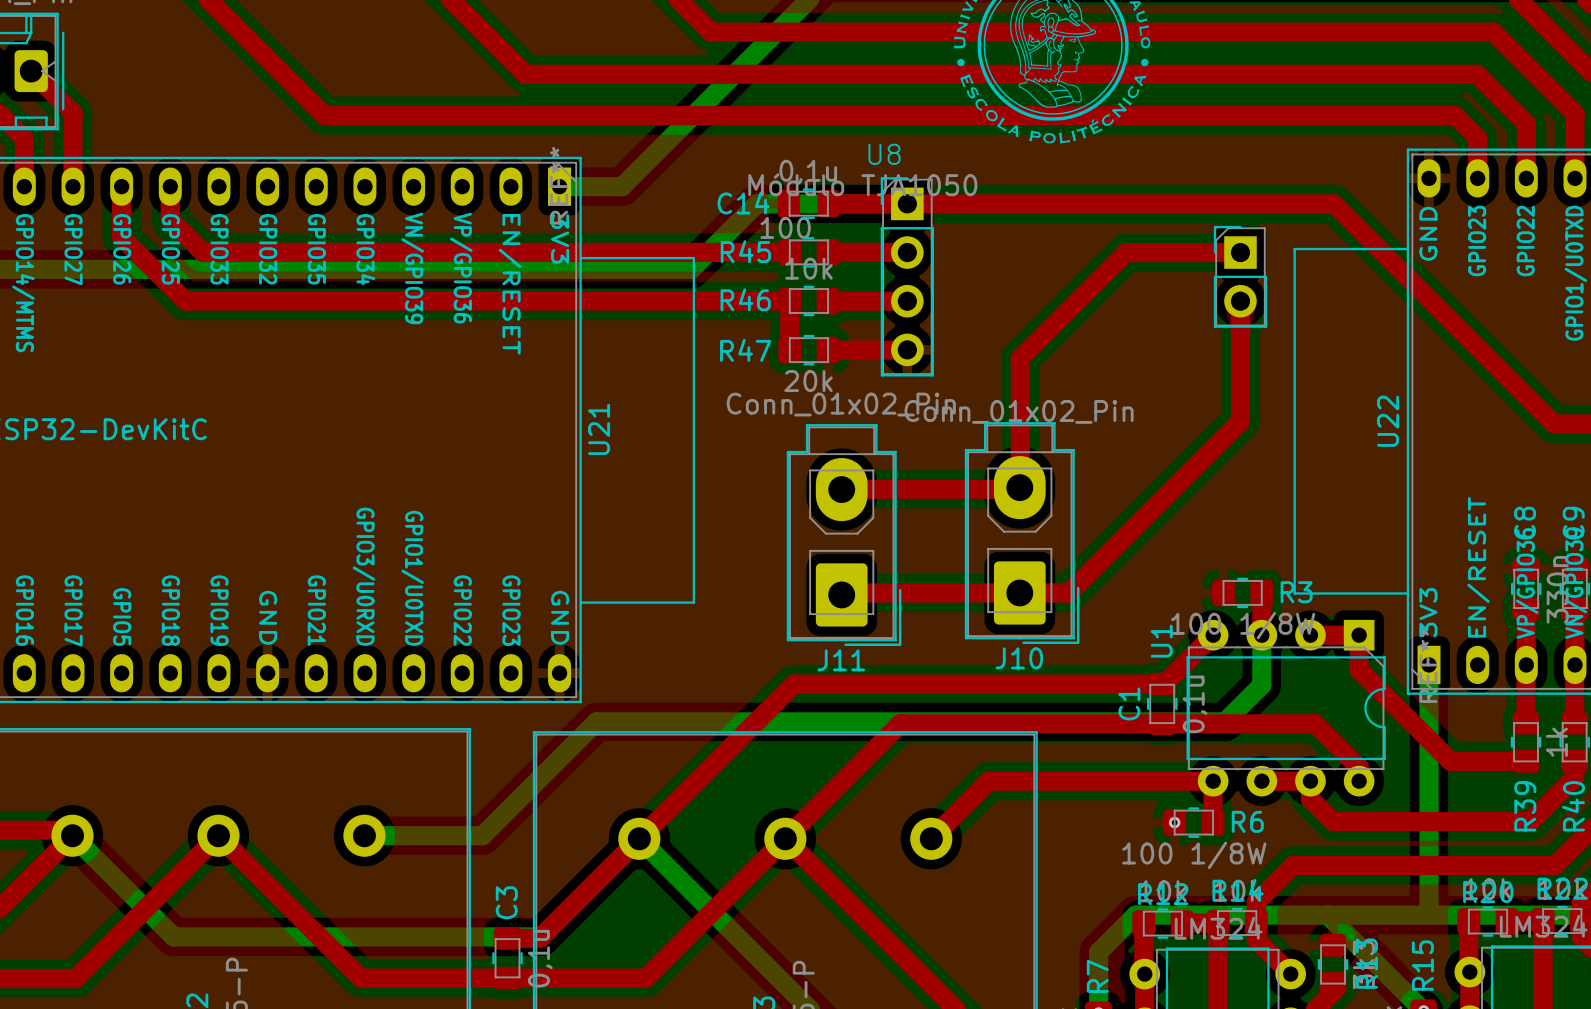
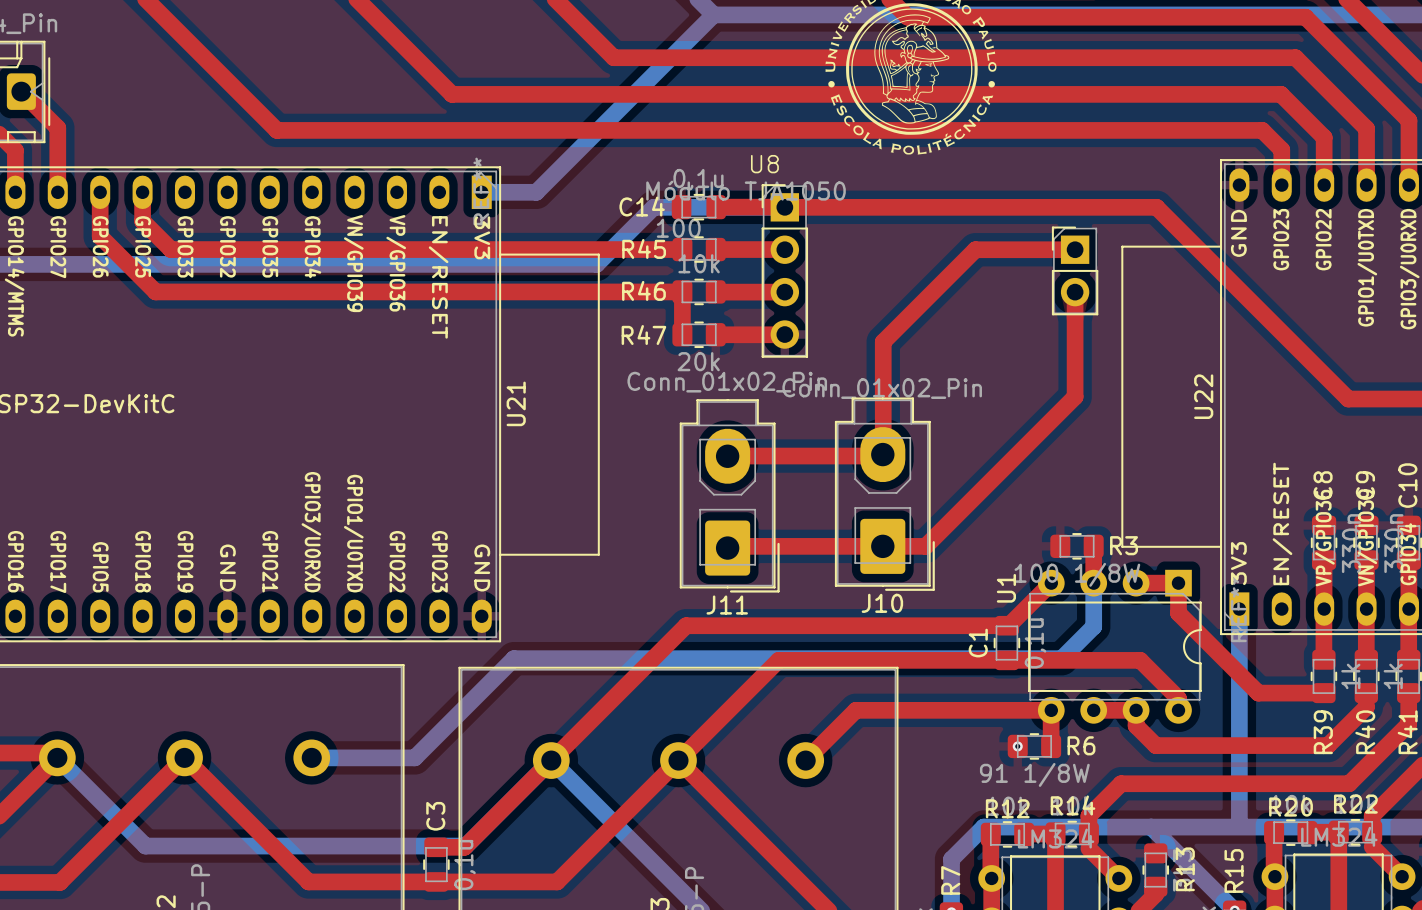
R6 value: 100 1/8W (1194, 855) -> 91 1/8W (1034, 774)

